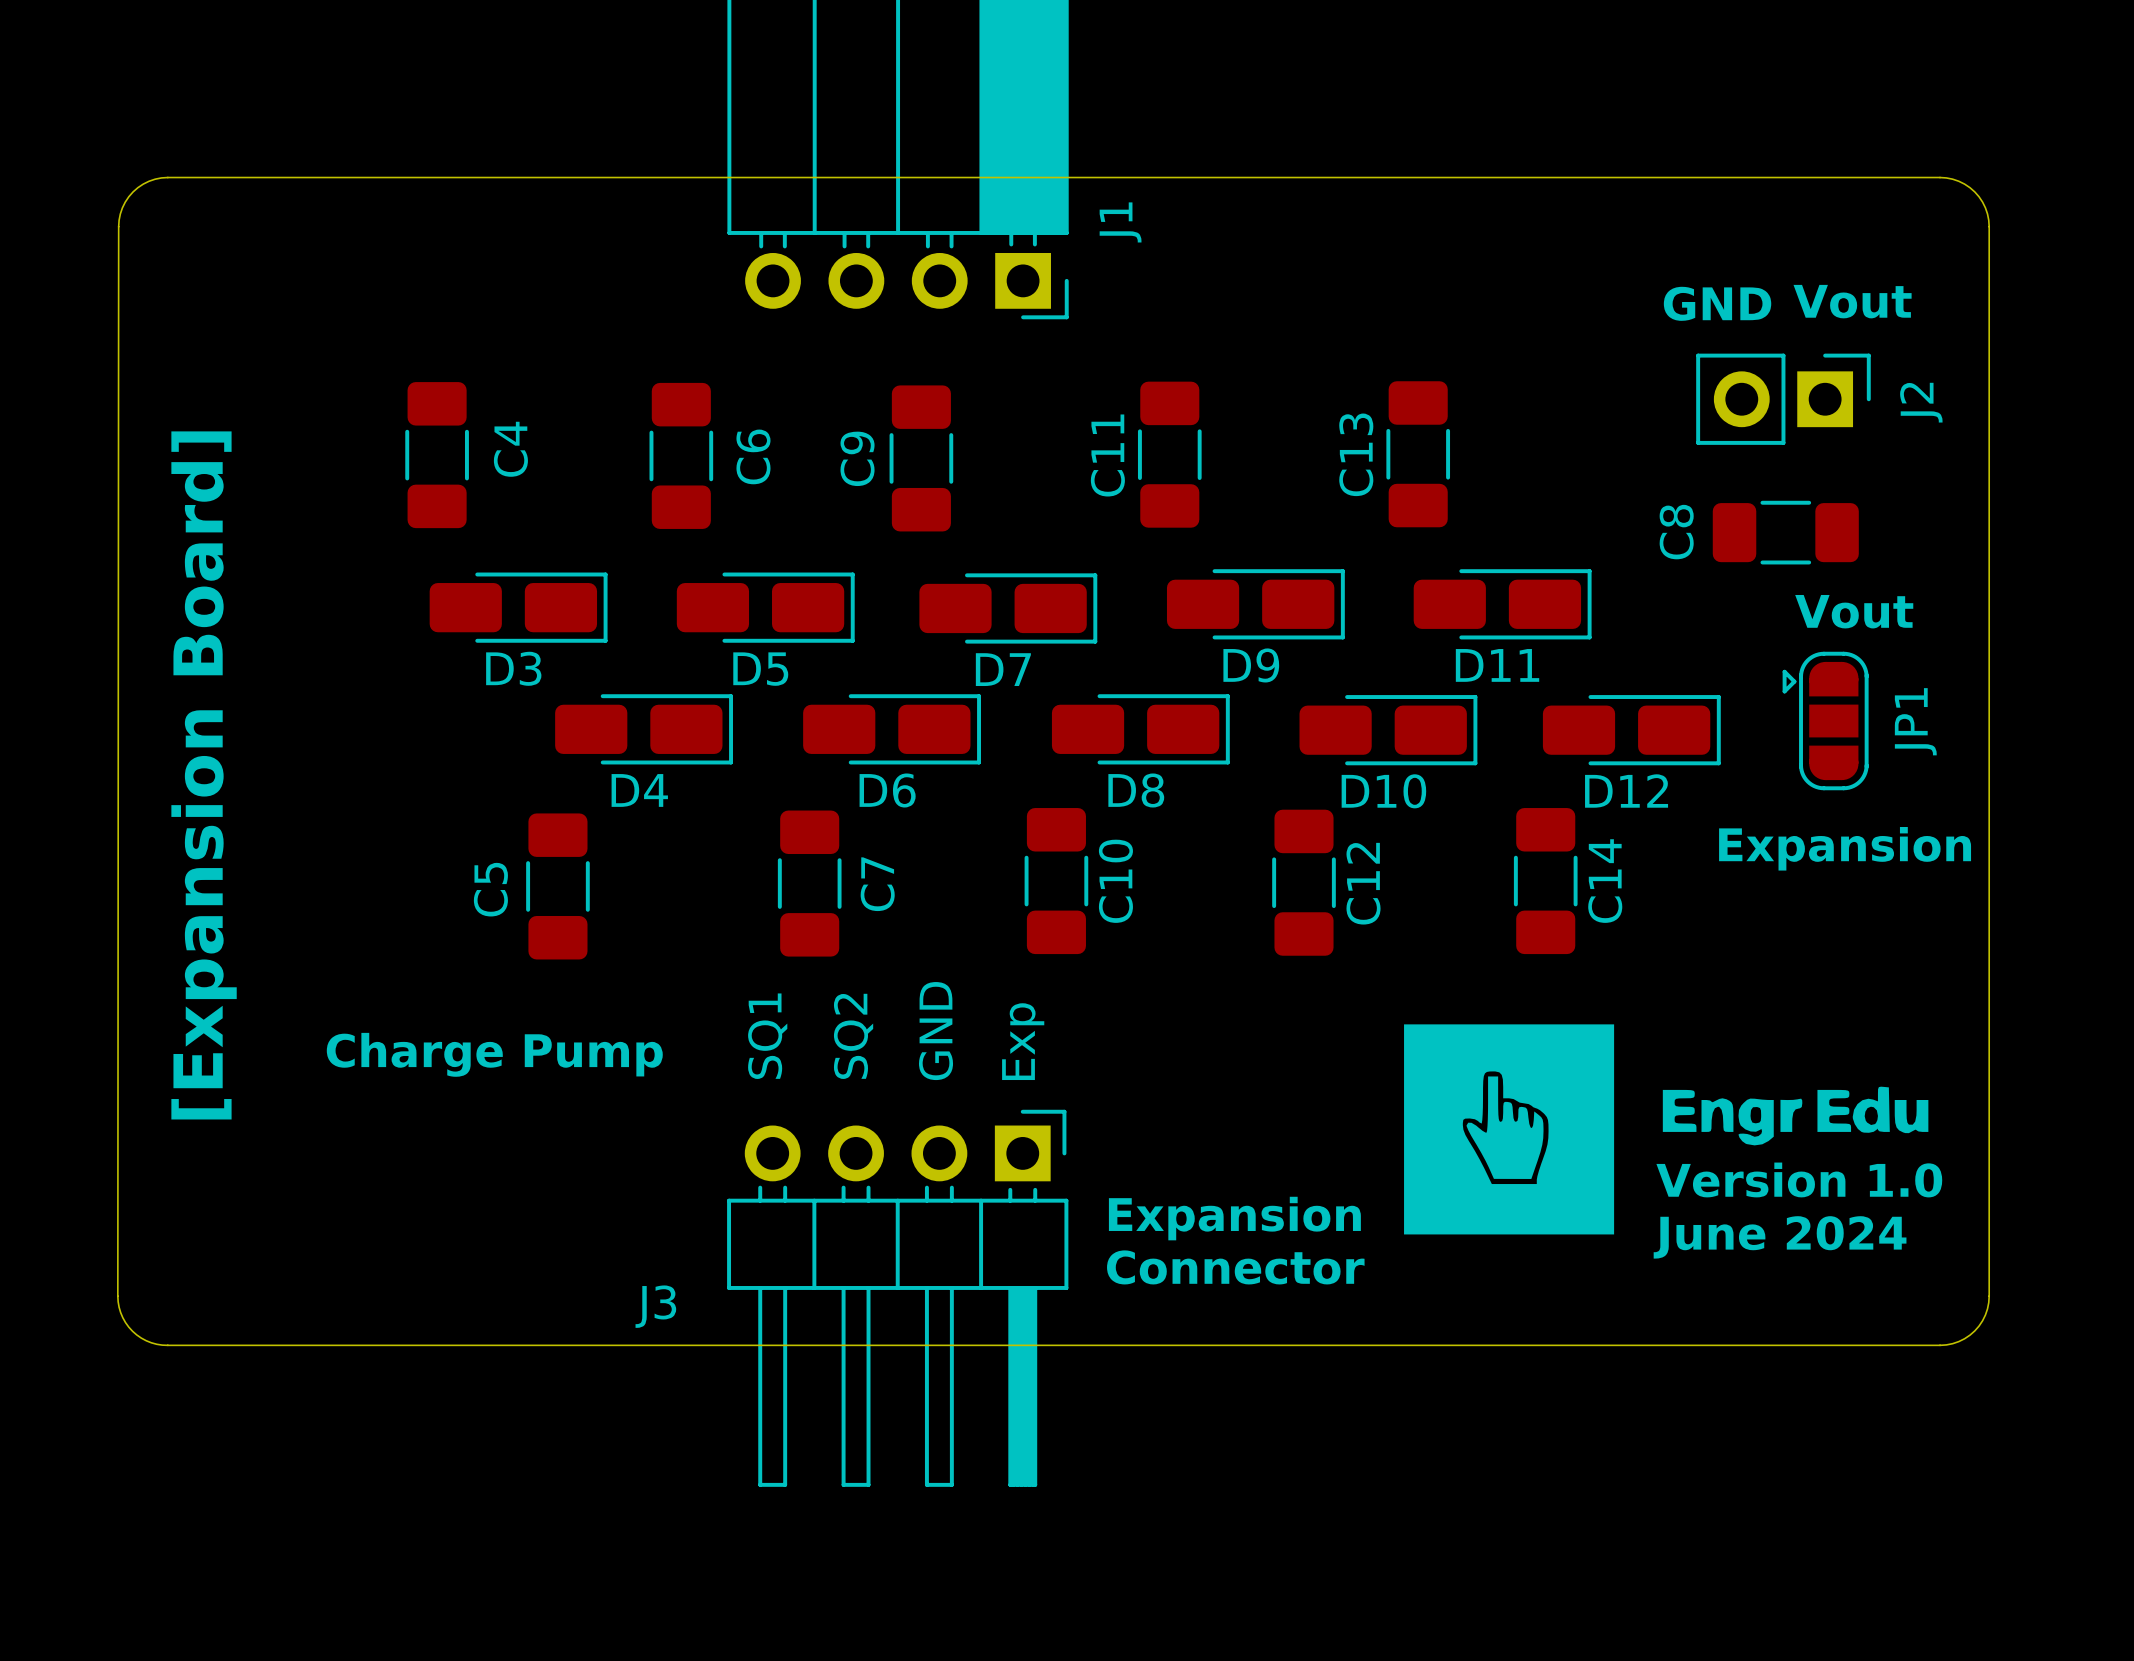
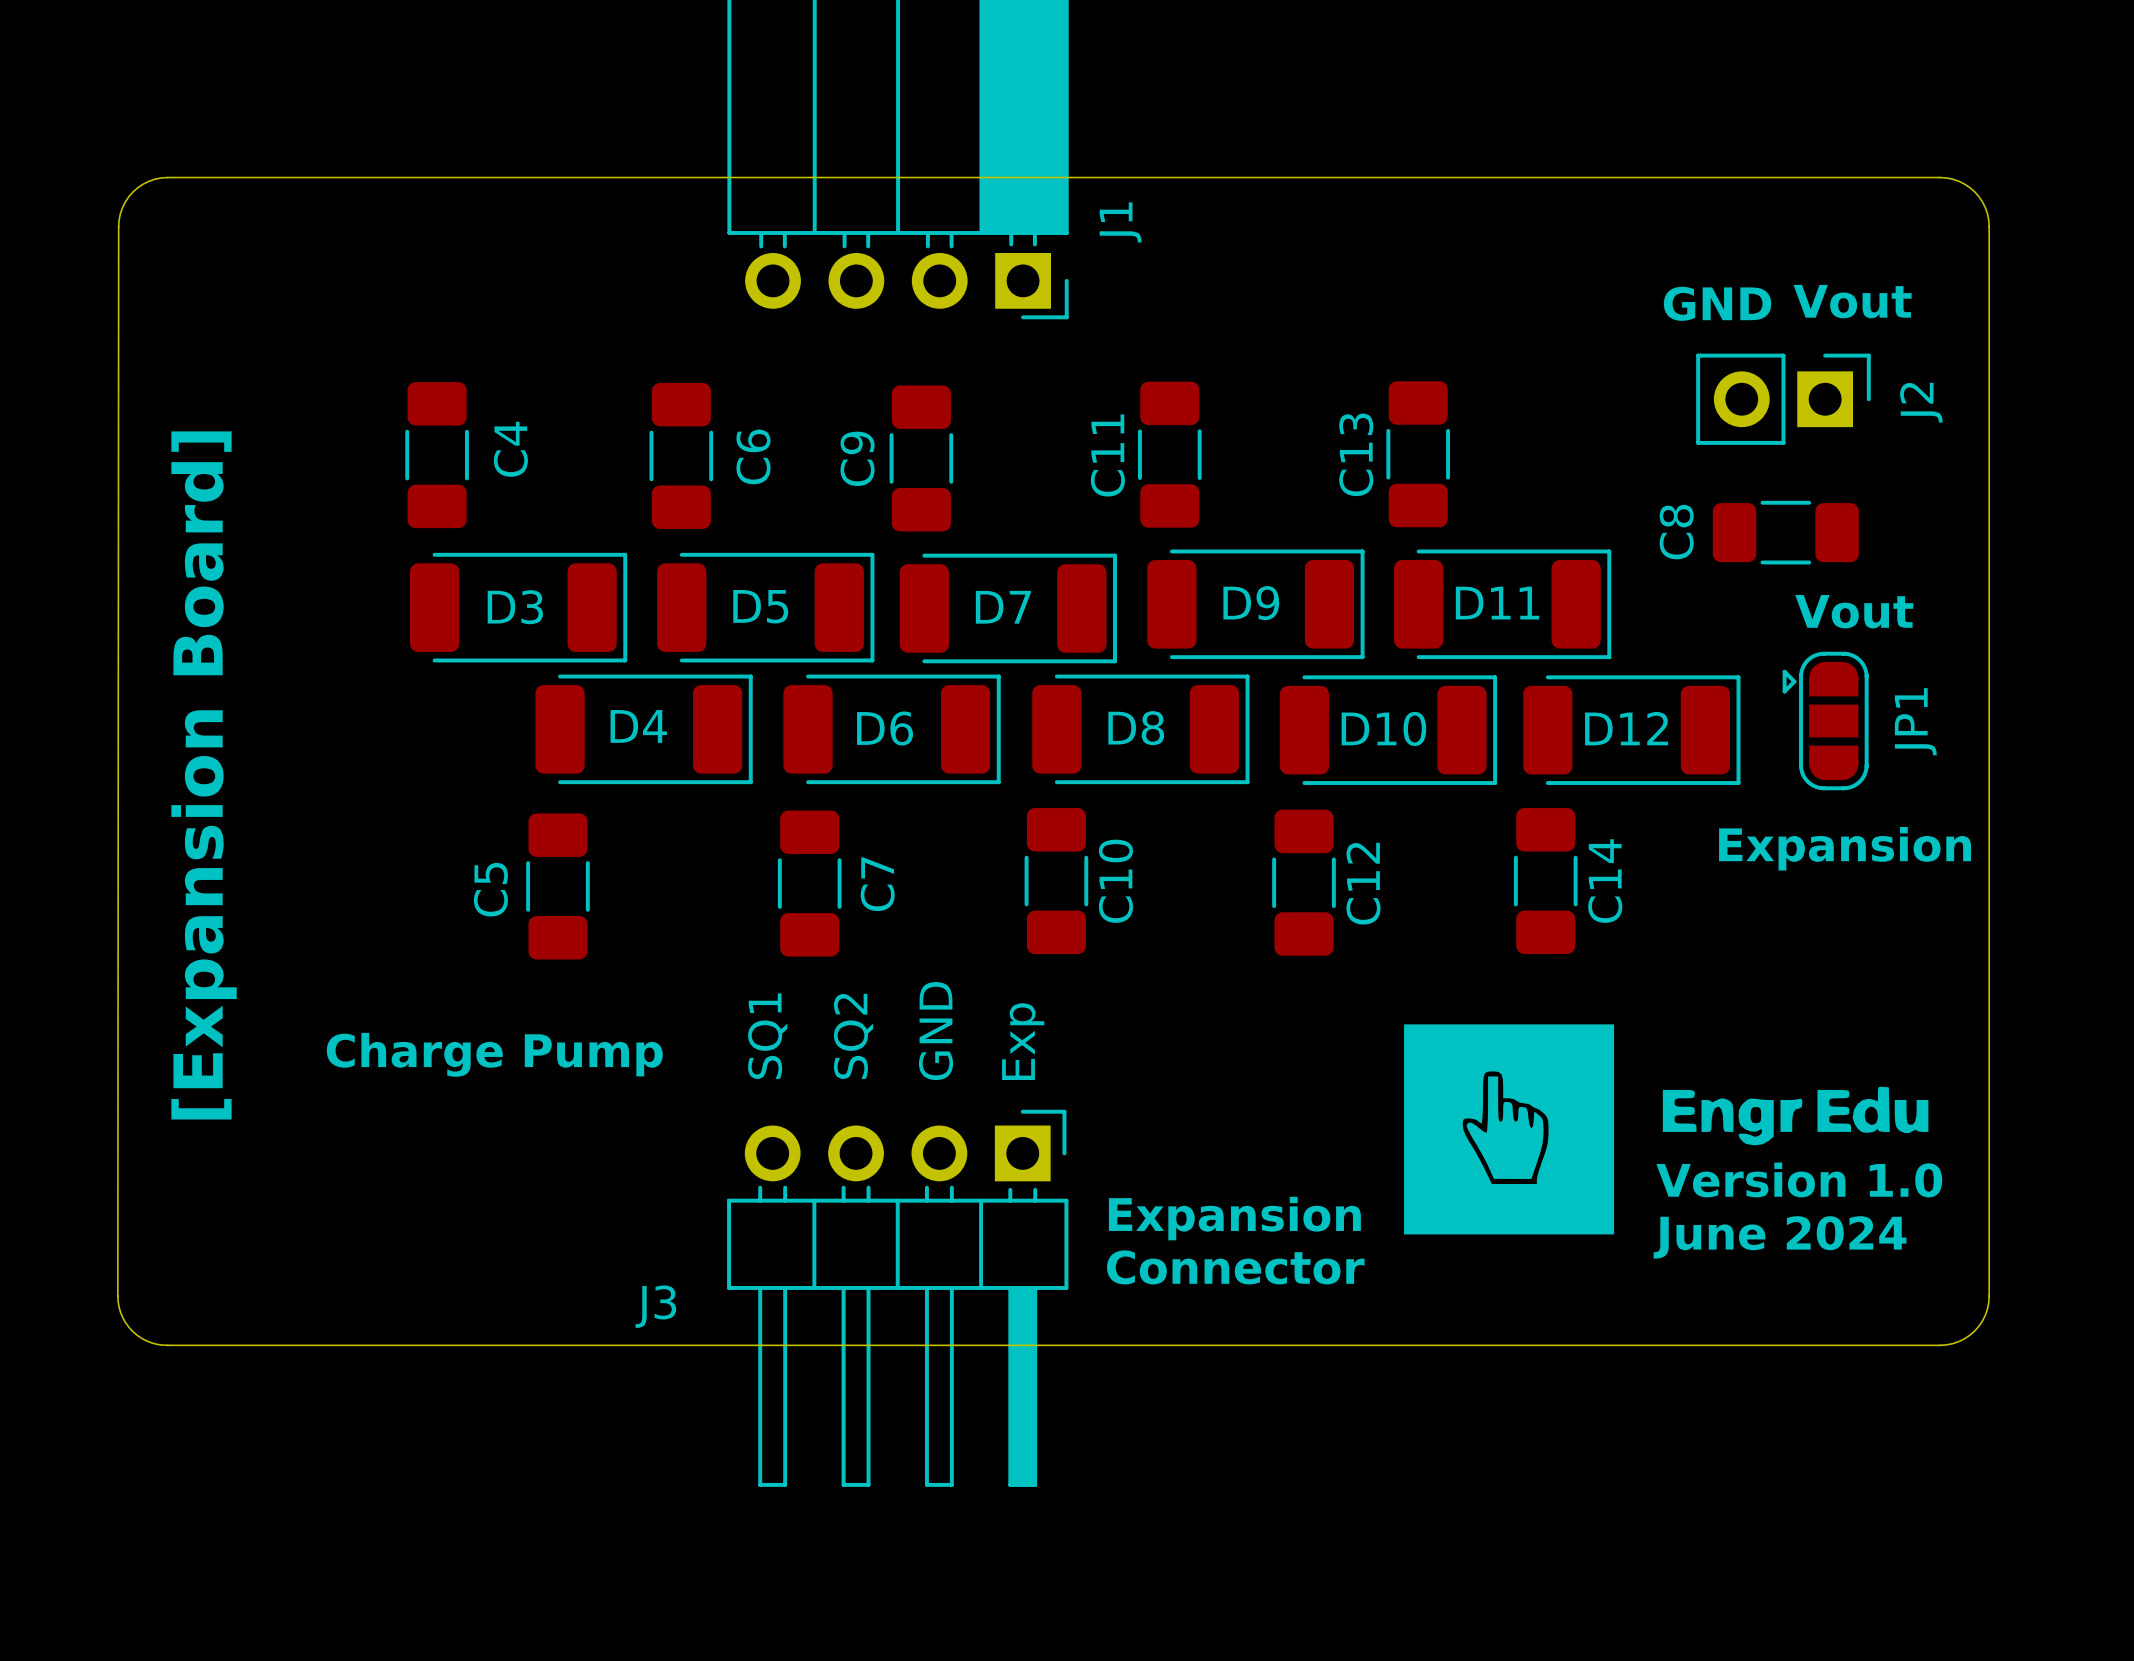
D9 footprint: [1166, 569, 1345, 640] -> [1147, 549, 1365, 660]
D11 footprint: [1413, 569, 1592, 640] -> [1394, 549, 1612, 660]
D3 footprint: [429, 572, 608, 643] -> [409, 552, 628, 663]
D5 footprint: [676, 572, 855, 643] -> [657, 552, 875, 663]
D7 footprint: [919, 573, 1098, 644] -> [899, 553, 1117, 664]
D4 footprint: [555, 694, 734, 765] -> [535, 674, 753, 785]
D6 footprint: [803, 694, 982, 765] -> [783, 674, 1001, 785]
D8 footprint: [1051, 694, 1230, 765] -> [1032, 674, 1250, 785]
D10 footprint: [1299, 695, 1478, 766] -> [1279, 675, 1498, 785]
D12 footprint: [1542, 695, 1721, 766] -> [1523, 675, 1741, 785]

